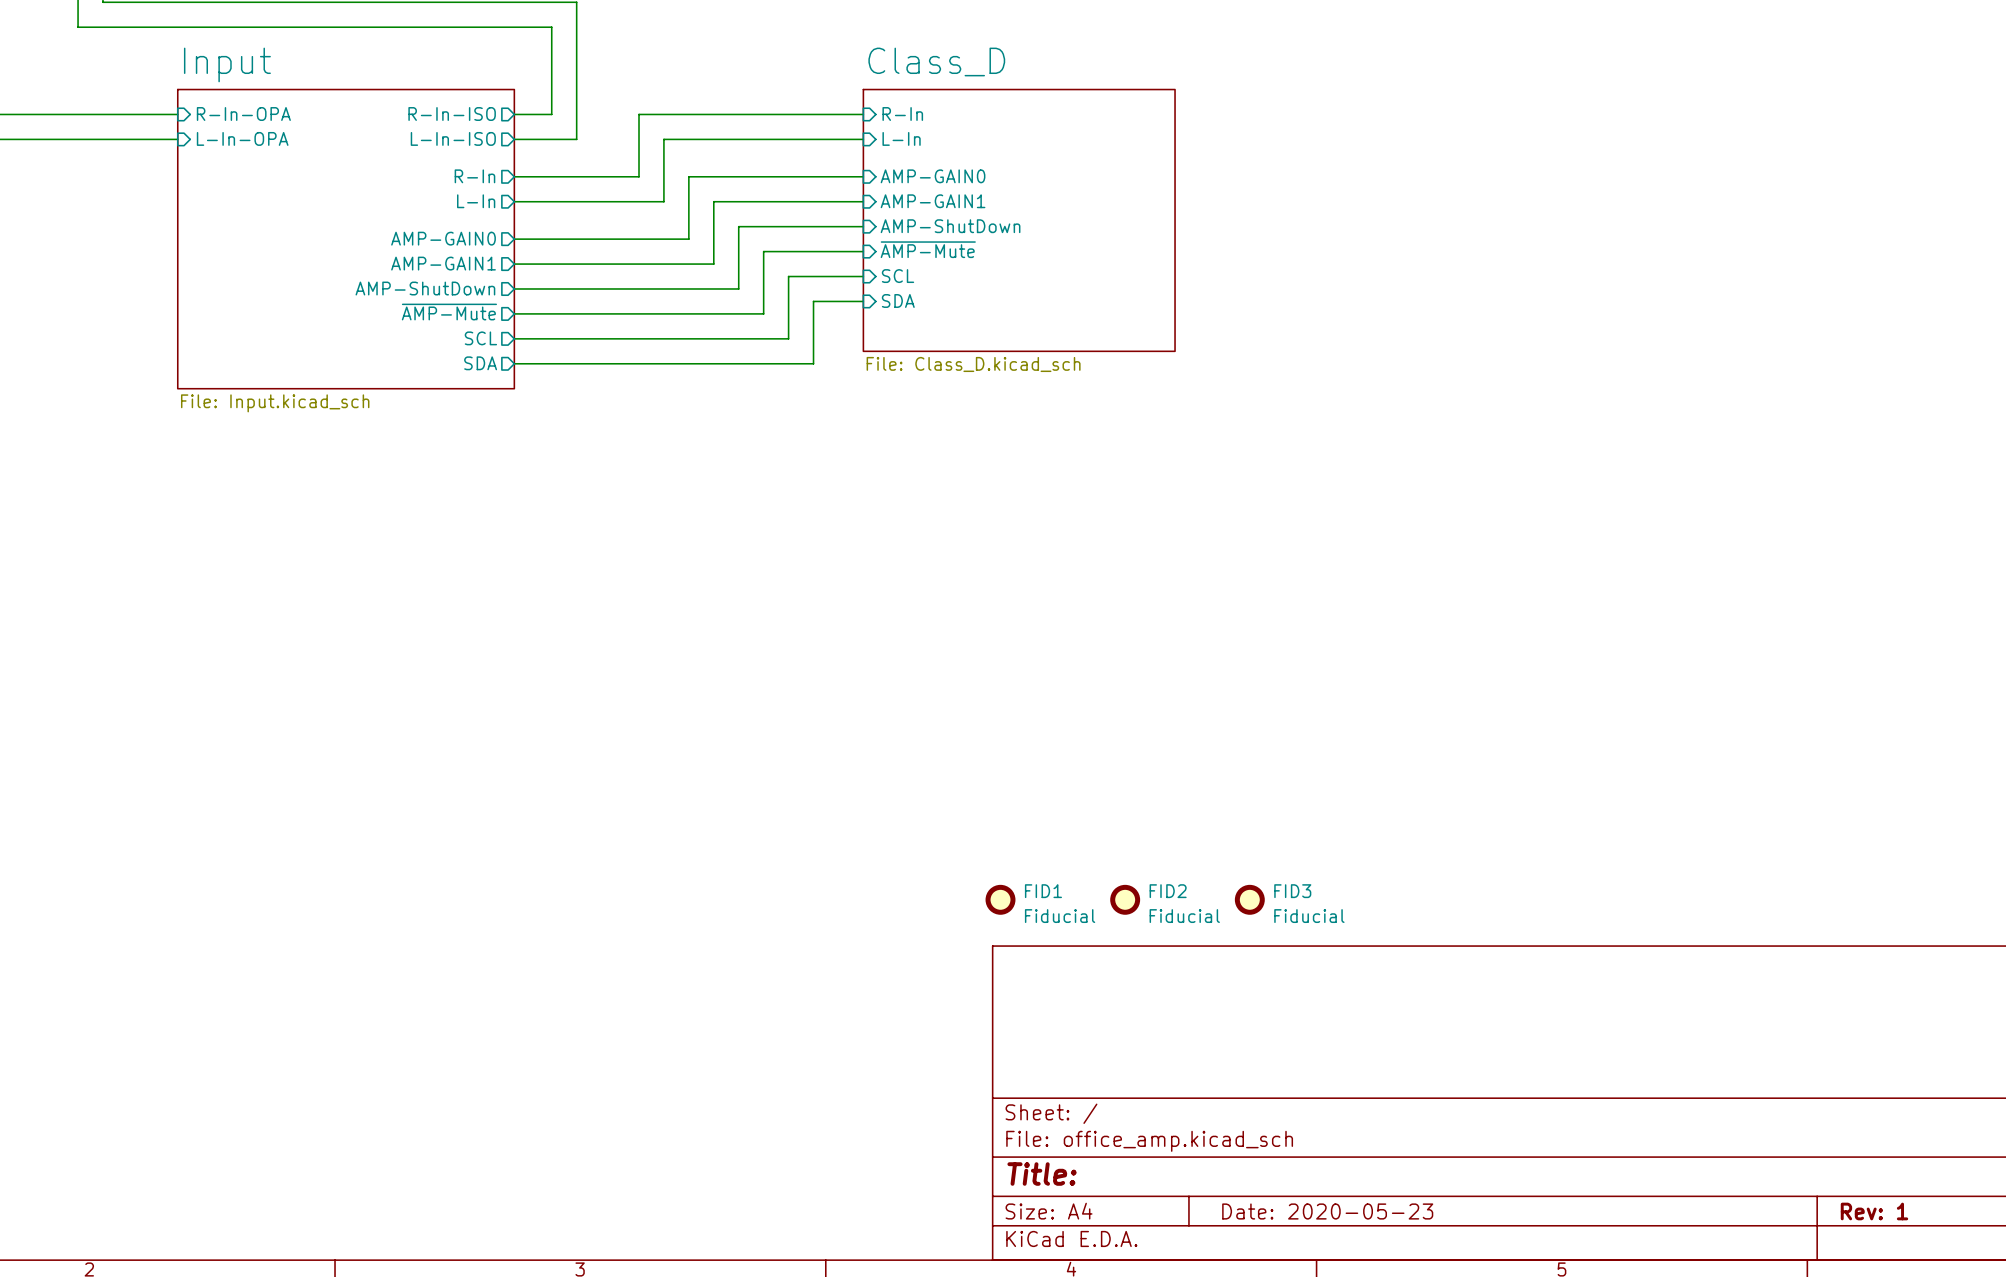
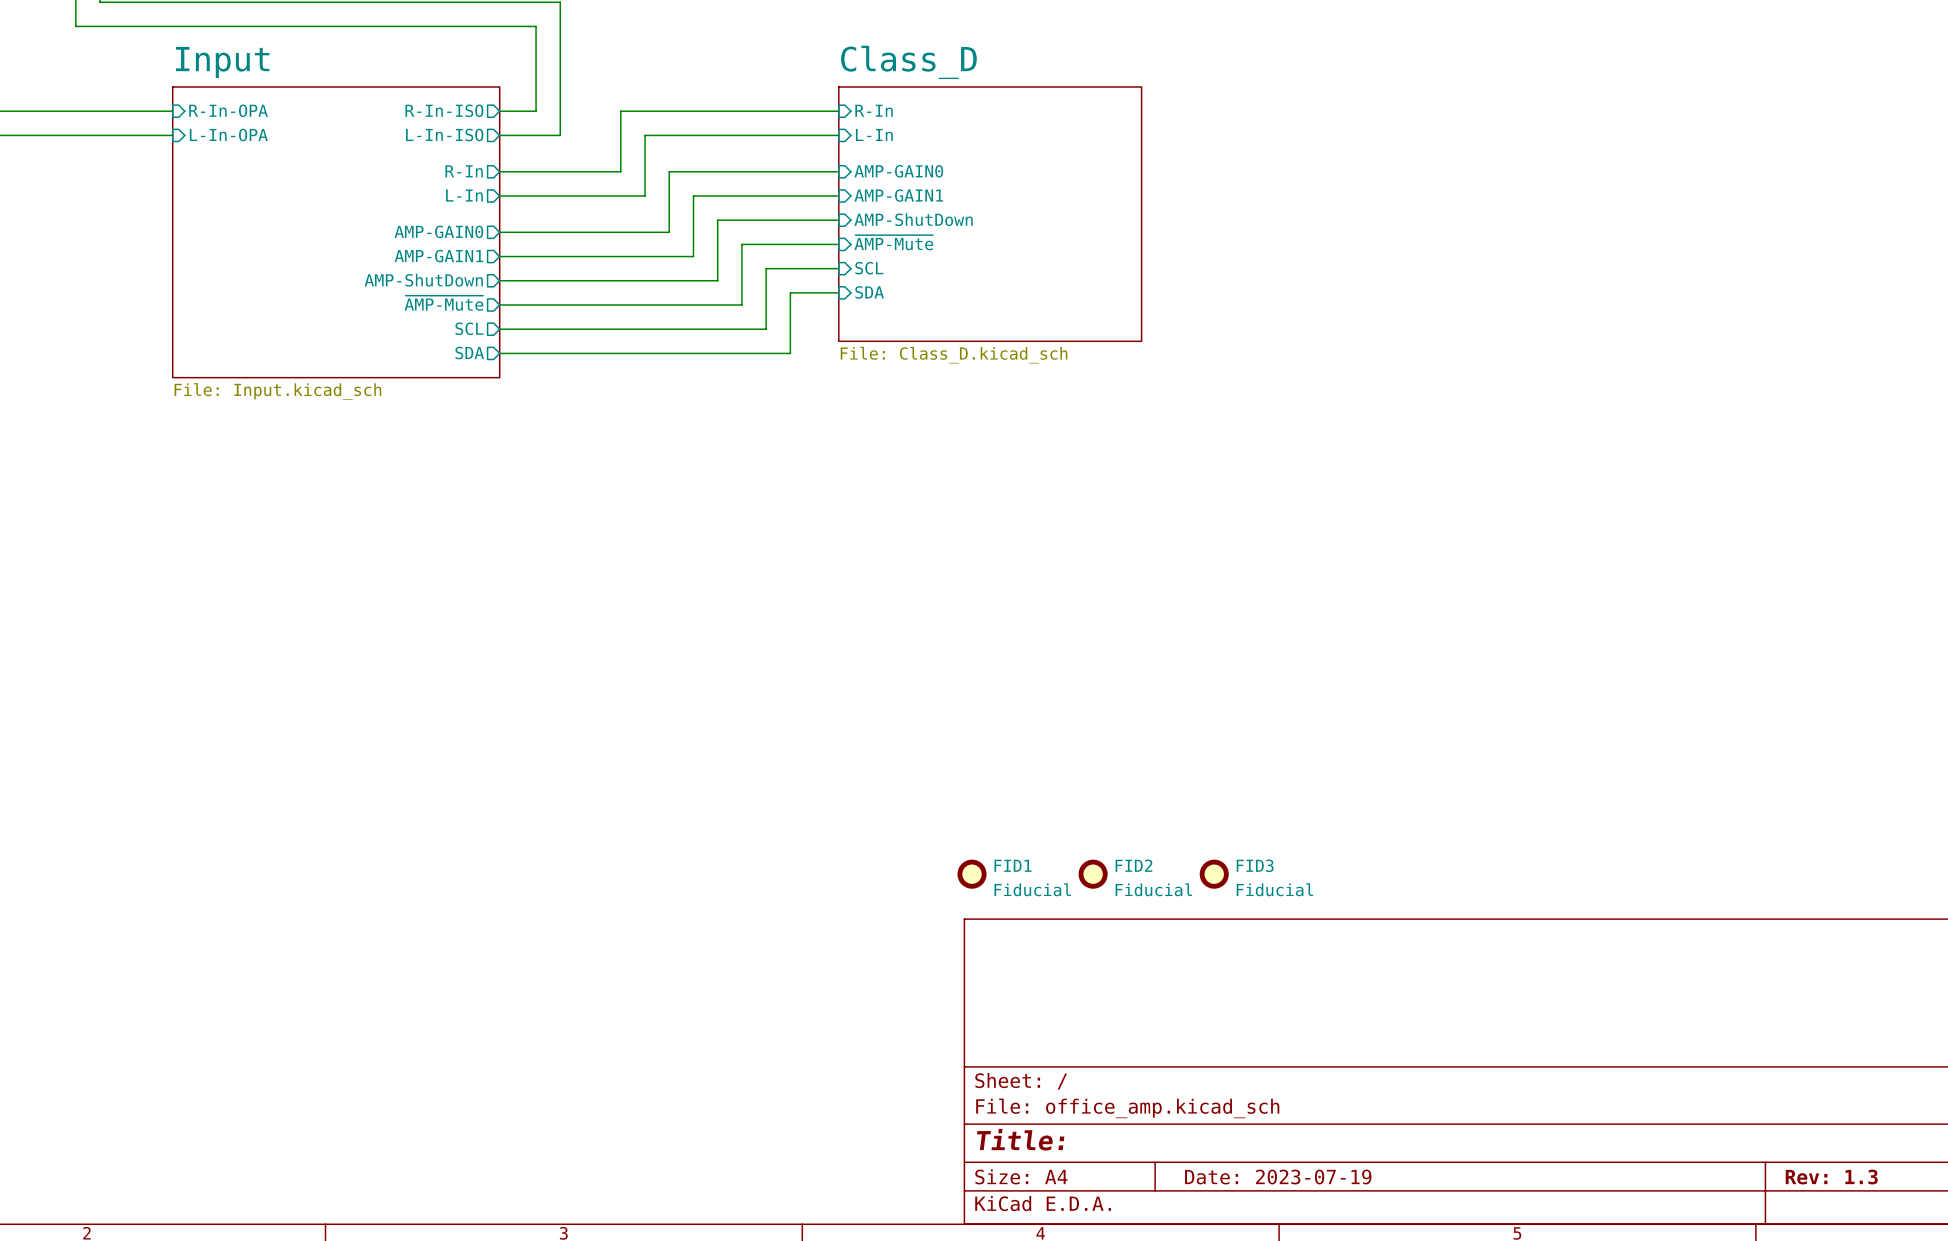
title block: Date: 2020-05-23 (1327, 1211) -> Date: 2023-07-19 (1278, 1177)
title block: Rev: 1 (1874, 1211) -> Rev: 1.3 (1831, 1177)

